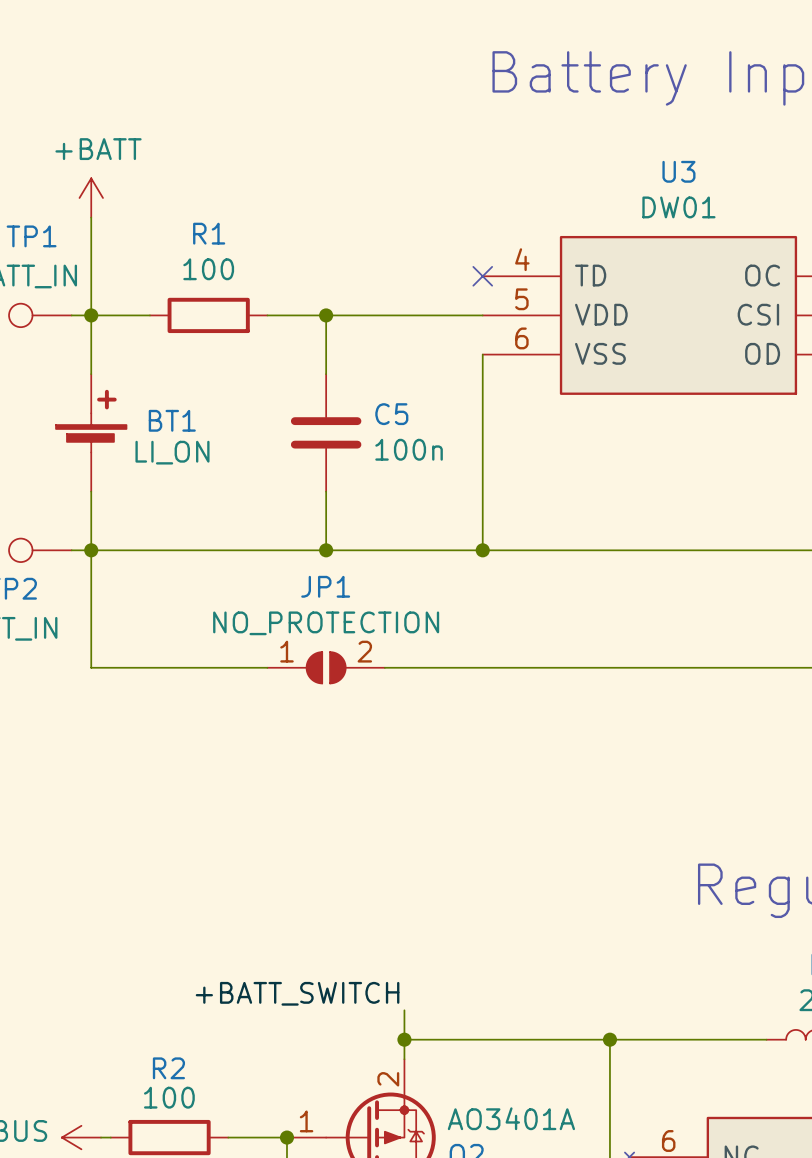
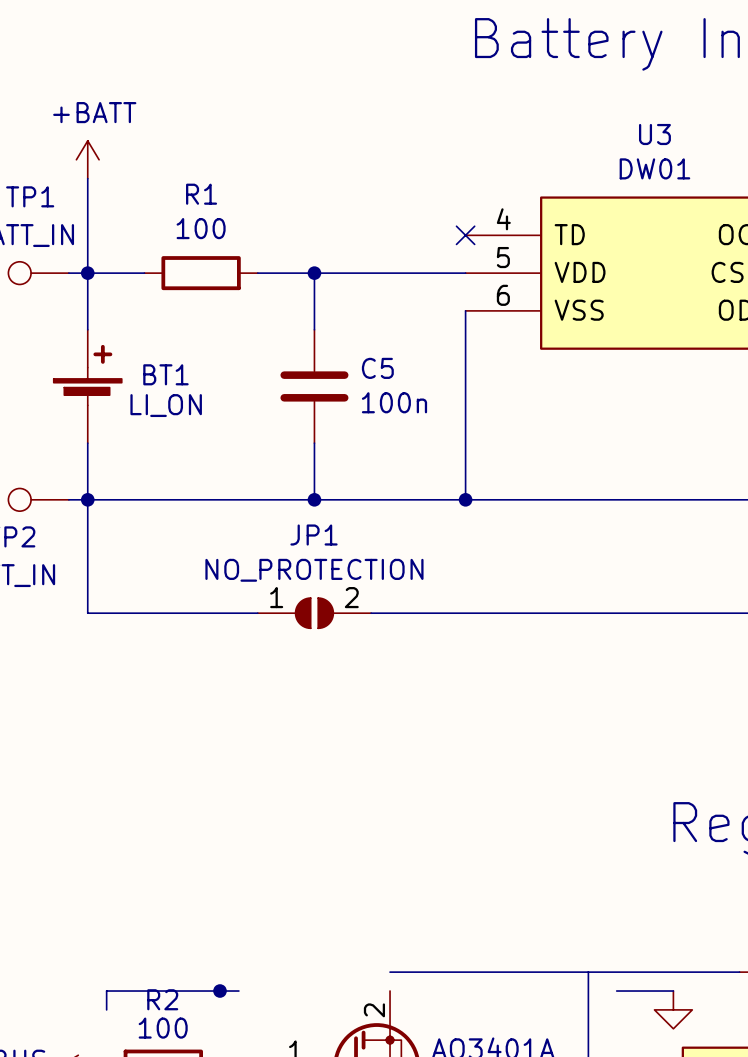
label: +BATT_SWITCH (297, 993) -> none
wire: (404, 1010) (404, 1059) -> none
junction: (404, 1039) -> none
junction: (609, 1039) -> none
junction: none -> (219, 991)
wire: none -> (238, 991) (106, 991) (106, 1009)
wire: none -> (616, 991) (673, 991)
power symbol: none -> (673, 1009)

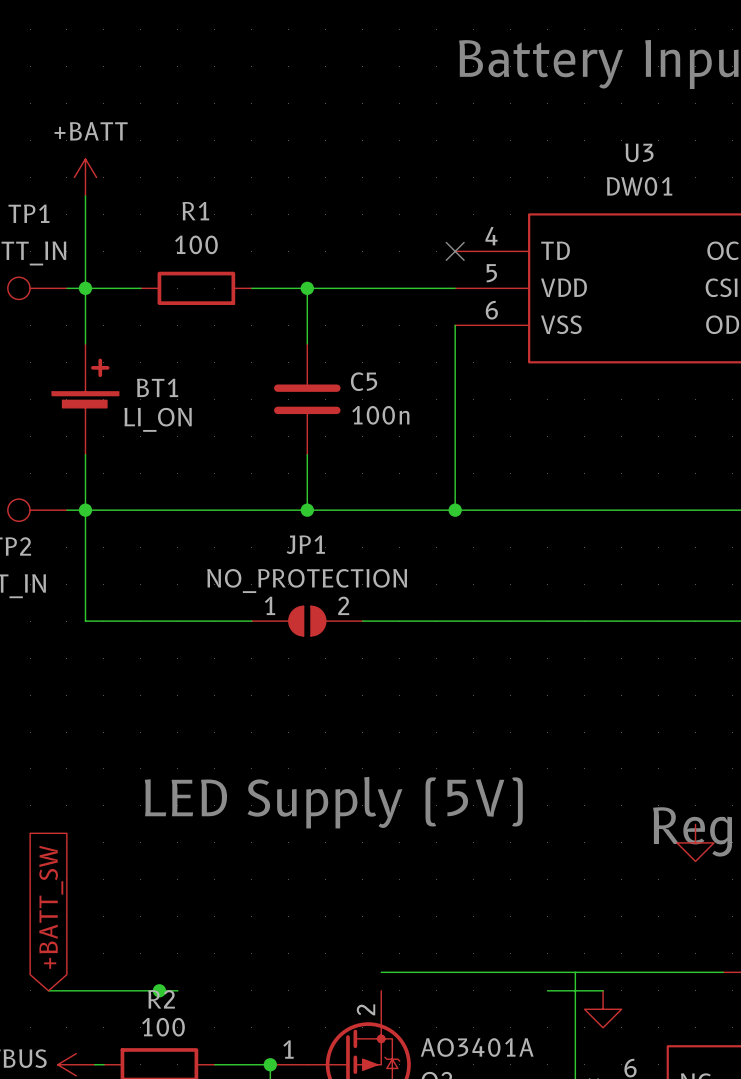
text: none -> LED Supply (5V) (333, 802)
power symbol: none -> (695, 842)
global label: none -> +BATT_SW (51, 907)
wire: (106, 991) (106, 1009) -> (103, 990) (48, 990)
wire: (182, 991) (238, 991) -> none
junction position: (219, 991) -> (159, 990)
wire: (616, 991) (673, 991) -> (603, 990) (547, 990)
power symbol position: (673, 1009) -> (603, 1009)

